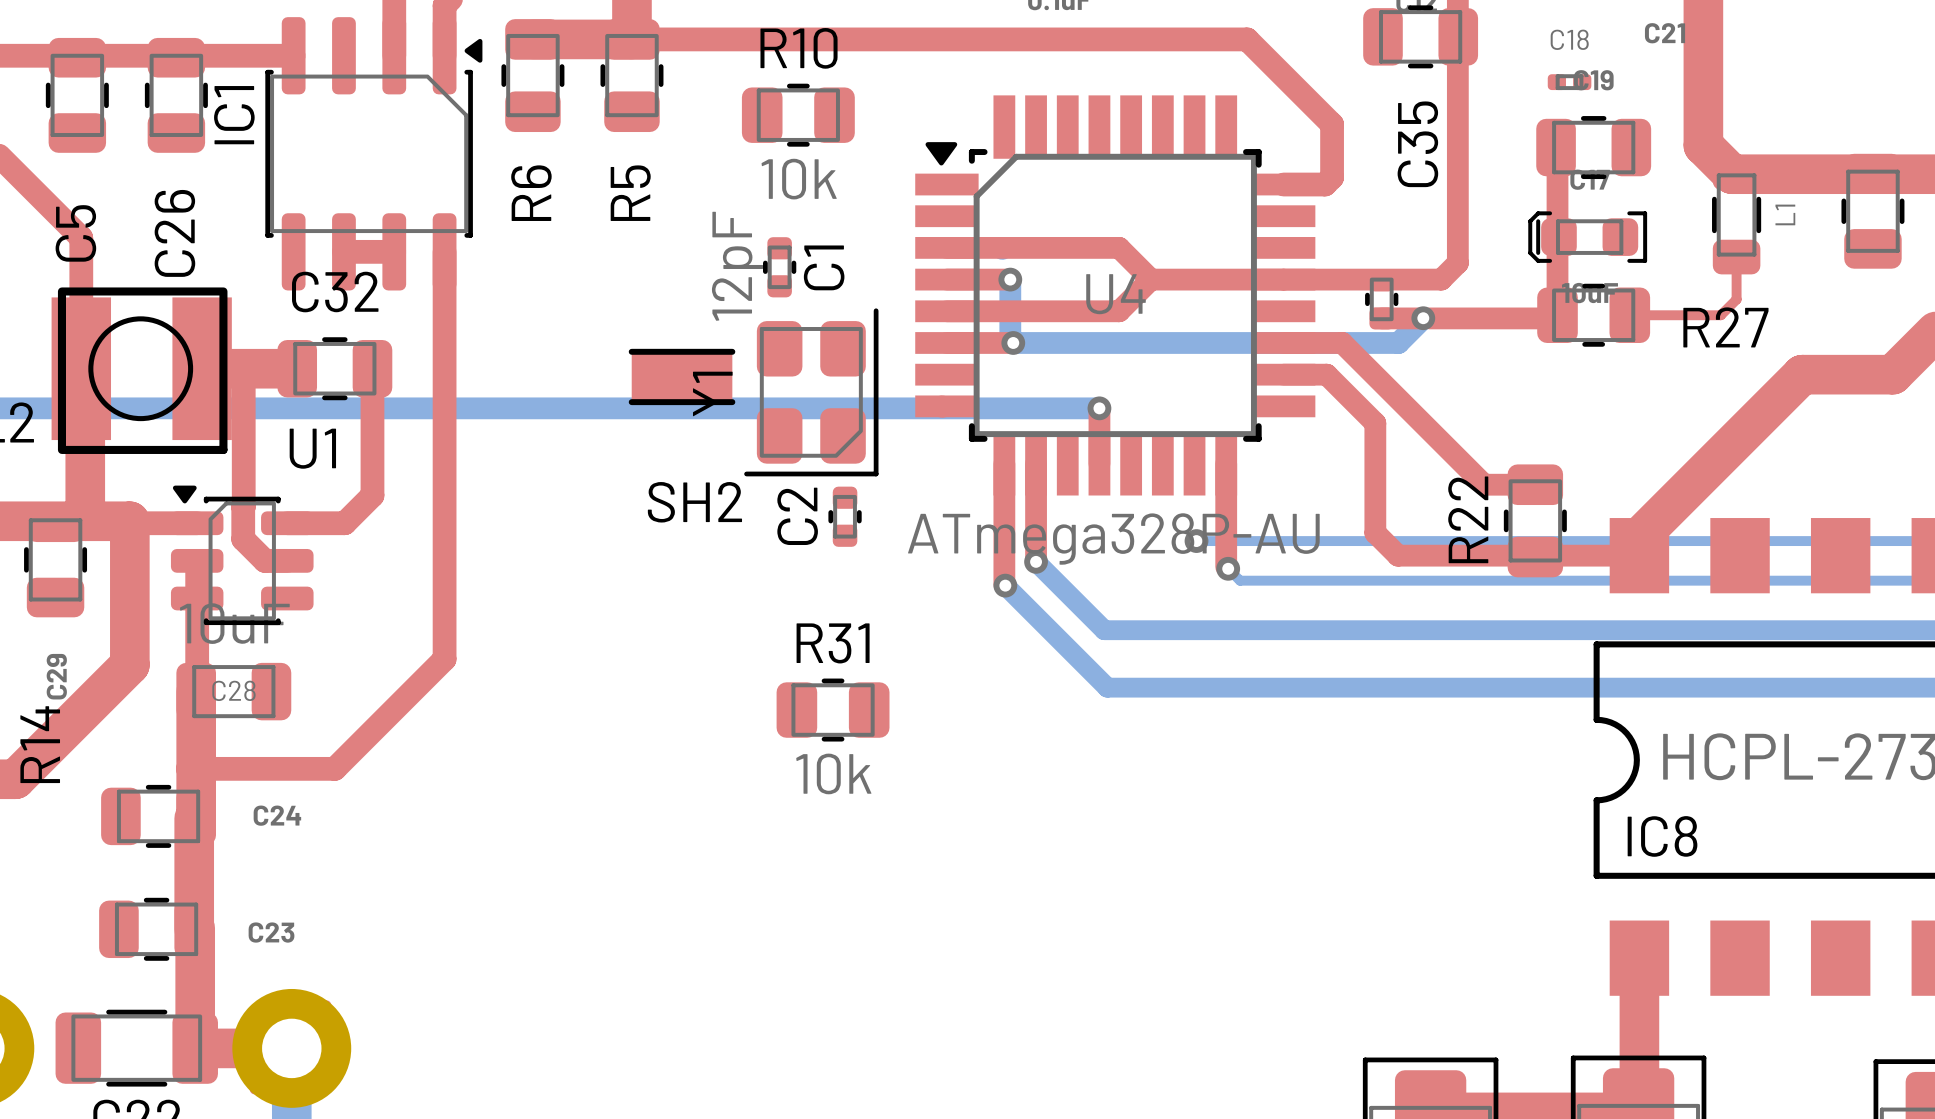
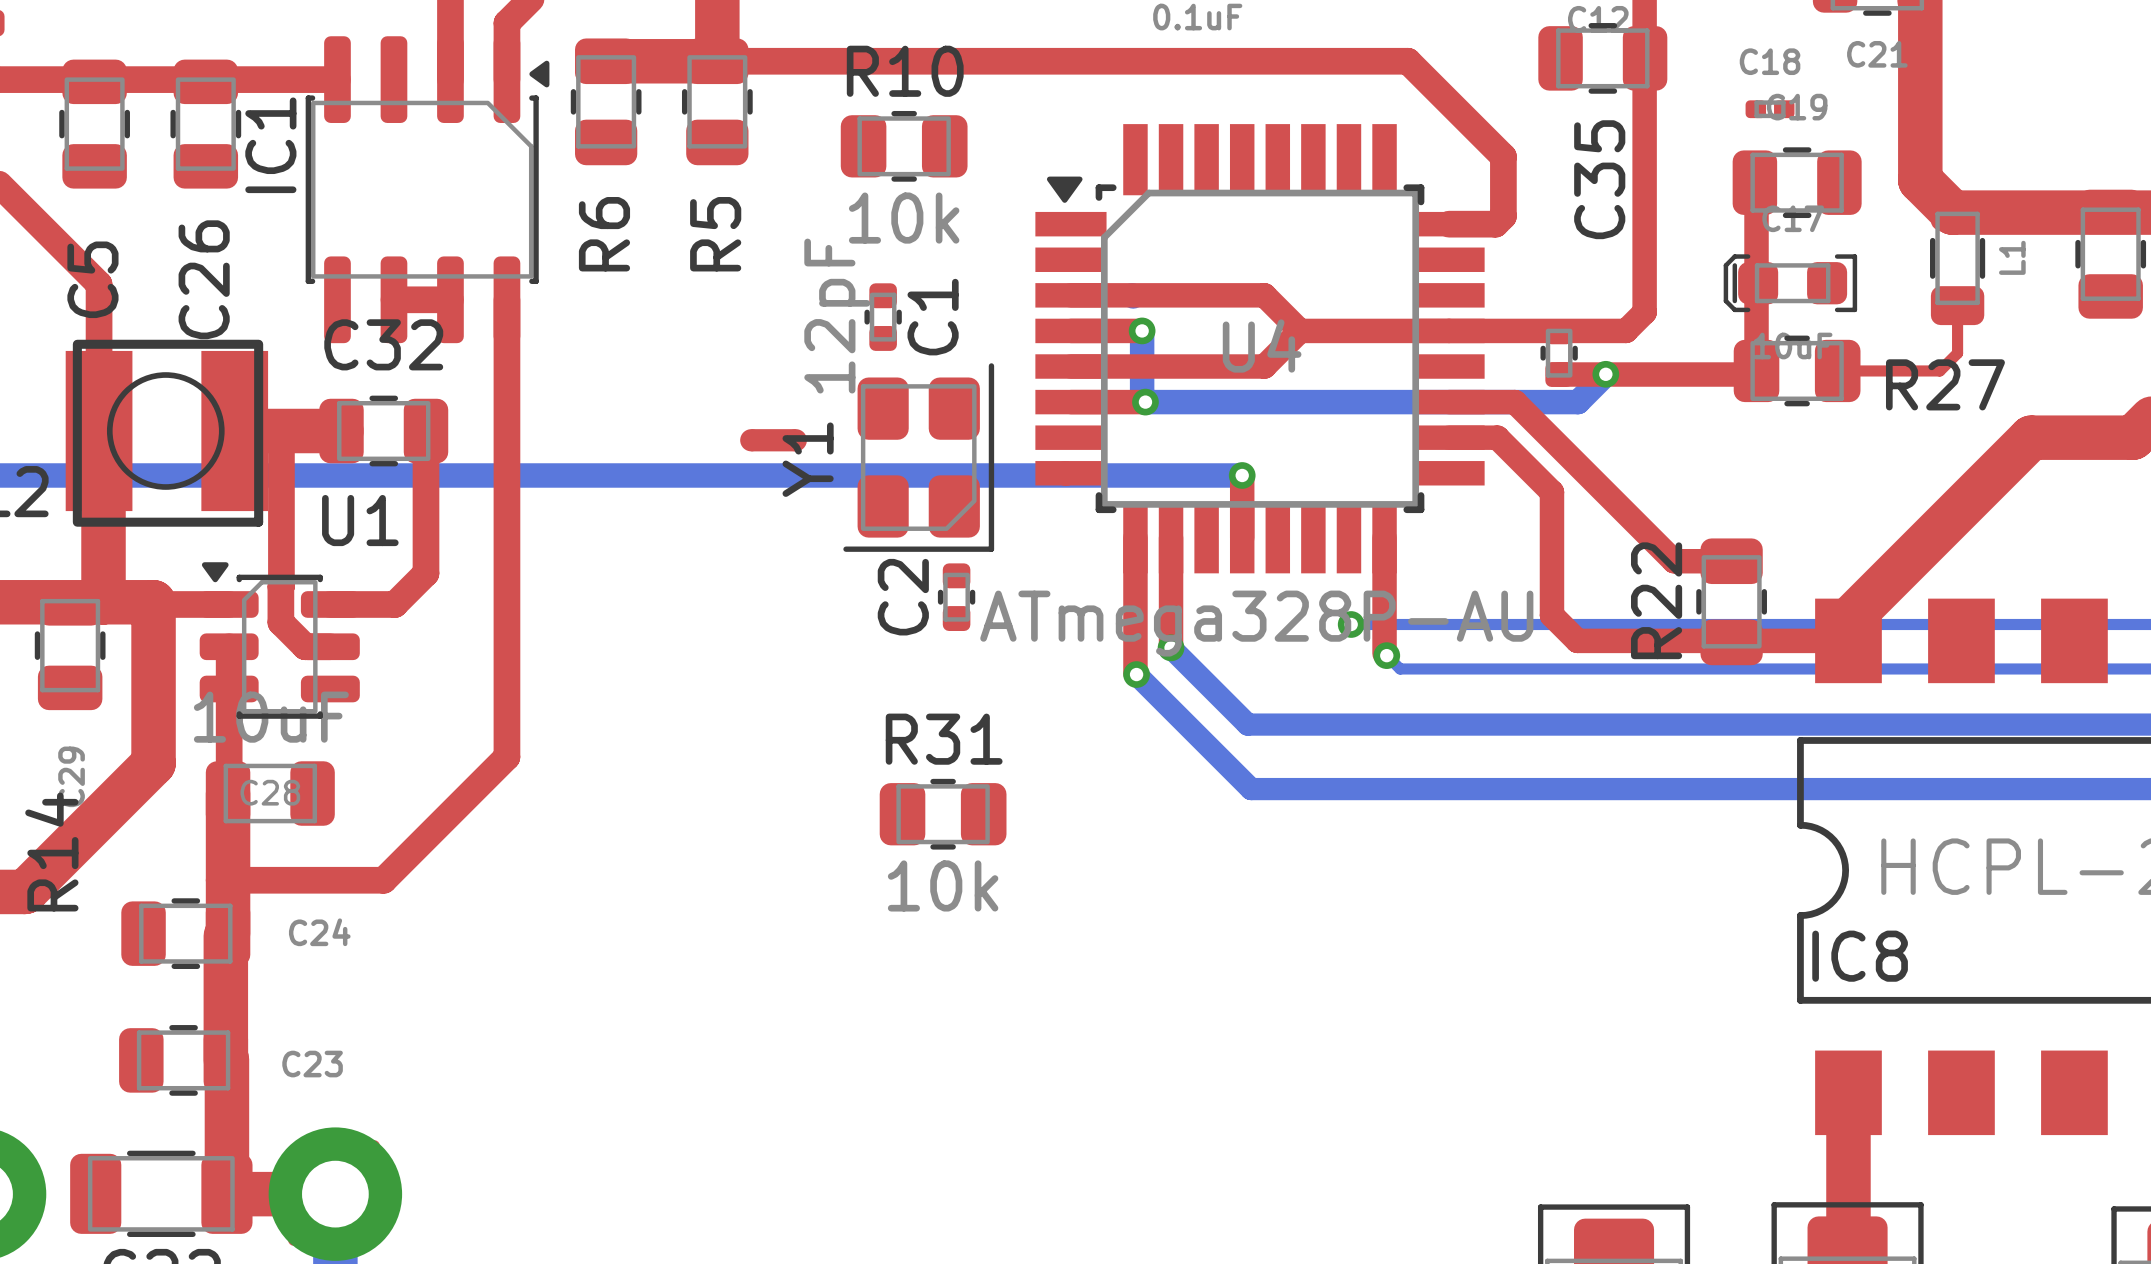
SH2: (682, 376) -> none
part: none -> (773, 440)

